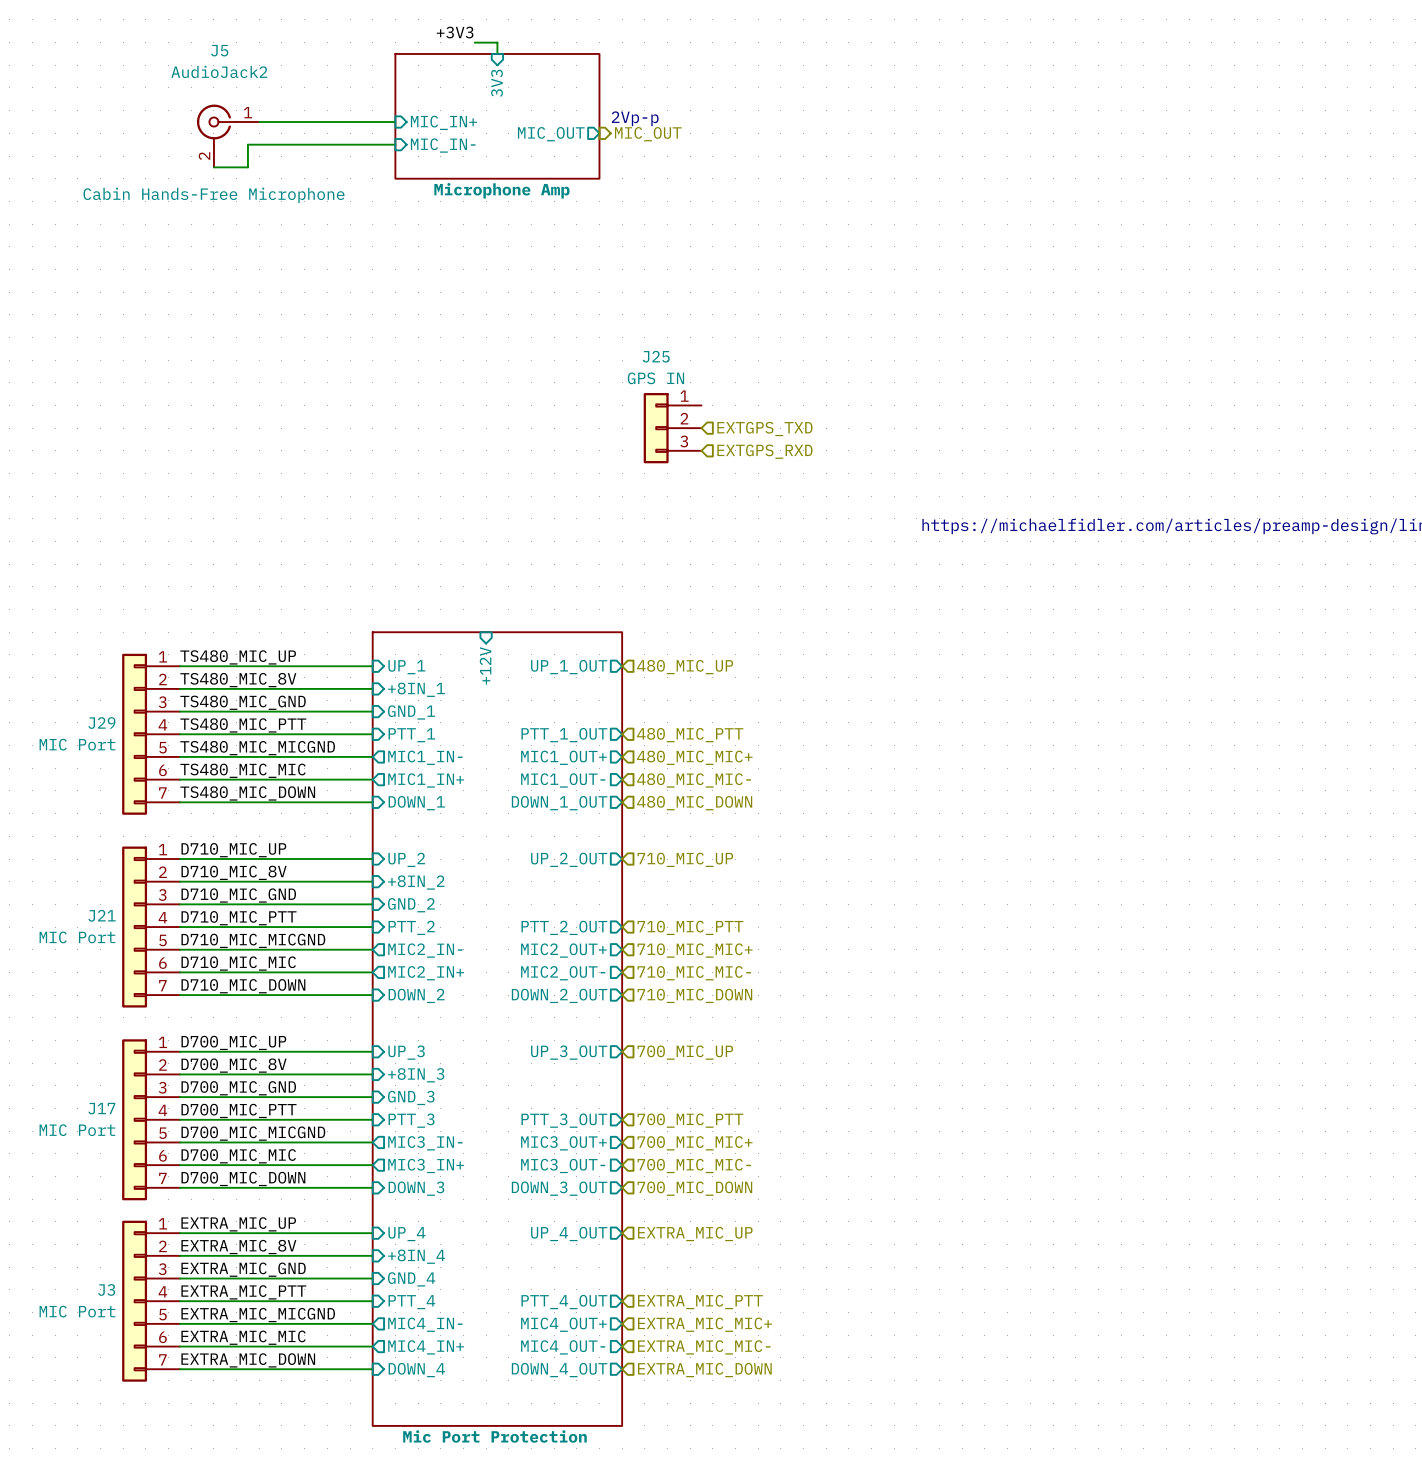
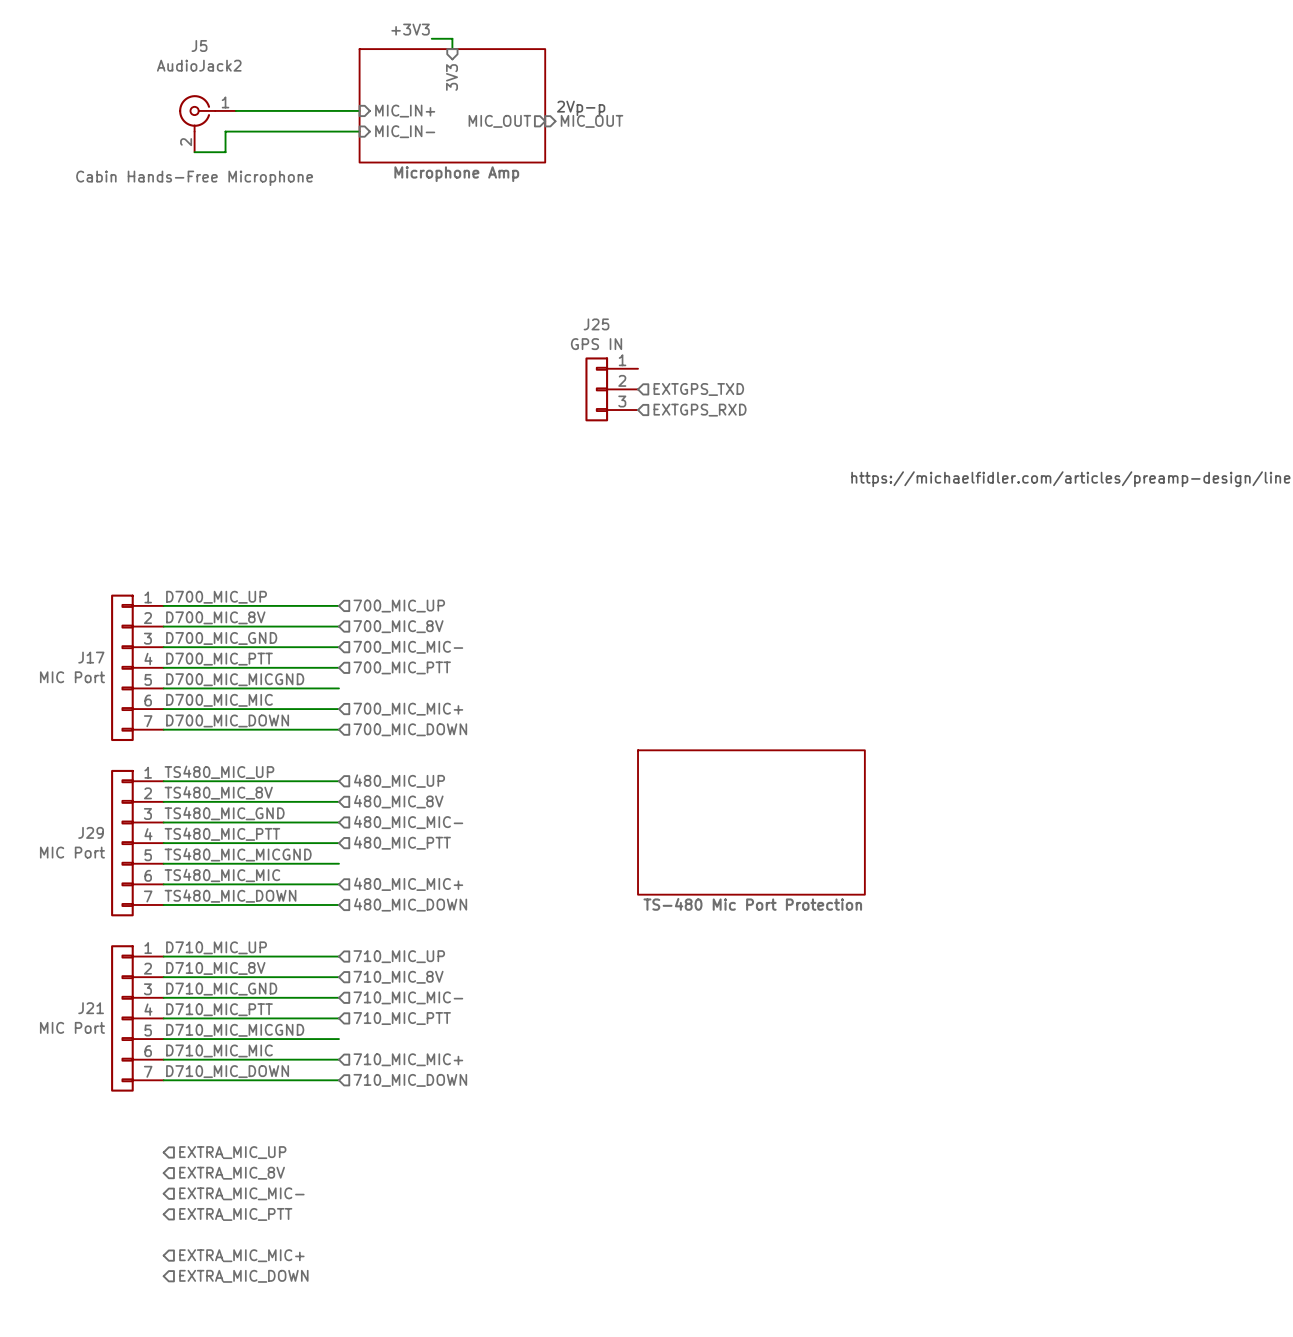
label: TS480_MIC_UP (238, 657) -> D700_MIC_UP (216, 597)
sheet pin: +12V (485, 665) -> none
sheet pin: UP_1 (406, 667) -> none
hierarchical label: none -> 700_MIC_UP (399, 606)
sheet pin: UP_1_OUT (569, 667) -> none
hierarchical label: 480_MIC_UP (685, 667) -> none
label: TS480_MIC_8V (238, 680) -> D700_MIC_8V (215, 617)
sheet pin: +8IN_1 (416, 689) -> none
hierarchical label: none -> 700_MIC_8V (398, 626)
label: TS480_MIC_GND (243, 702) -> D700_MIC_GND (221, 638)
sheet pin: GND_1 (411, 712) -> none
hierarchical label: none -> 700_MIC_MIC- (408, 647)
J29 name: J29 (101, 723) -> J17 (91, 657)
label: TS480_MIC_PTT (243, 725) -> D700_MIC_PTT (219, 659)
sheet pin: PTT_1 (411, 735) -> none
hierarchical label: none -> 700_MIC_PTT (402, 667)
sheet pin: PTT_1_OUT (564, 735) -> none
hierarchical label: 480_MIC_PTT (690, 735) -> none
label: TS480_MIC_MICGND (257, 748) -> D700_MIC_MICGND (235, 679)
sheet pin: MIC1_IN- (425, 757) -> none
sheet pin: MIC1_OUT+ (563, 757) -> none
hierarchical label: 480_MIC_MIC+ (694, 757) -> none
label: TS480_MIC_MIC (243, 770) -> D700_MIC_MIC (219, 700)
sheet pin: MIC1_IN+ (426, 780) -> none
hierarchical label: none -> 700_MIC_MIC+ (408, 709)
sheet pin: MIC1_OUT- (563, 780) -> none
hierarchical label: 480_MIC_MIC- (694, 780) -> none
label: TS480_MIC_DOWN (247, 793) -> D700_MIC_DOWN (227, 720)
sheet pin: DOWN_1 (416, 803) -> none
hierarchical label: none -> 700_MIC_DOWN (410, 729)
sheet pin: DOWN_1_OUT (559, 803) -> none
hierarchical label: 480_MIC_DOWN (694, 803) -> none
label: D710_MIC_UP (233, 850) -> TS480_MIC_UP (219, 772)
sheet pin: UP_2 (406, 859) -> none
hierarchical label: none -> 480_MIC_UP (399, 781)
sheet pin: UP_2_OUT (569, 859) -> none
hierarchical label: 710_MIC_UP (685, 859) -> none
label: D710_MIC_8V (234, 872) -> TS480_MIC_8V (218, 792)
sheet pin: +8IN_2 (416, 882) -> none
hierarchical label: none -> 480_MIC_8V (398, 801)
label: D710_MIC_GND (238, 895) -> TS480_MIC_GND (224, 813)
sheet TS-480 Mic Port Protection: none -> (751, 822)
sheet pin: GND_2 (411, 905) -> none
hierarchical label: none -> 480_MIC_MIC- (408, 822)
J21 name: J21 (102, 915) -> J29 (91, 832)
label: D710_MIC_PTT (239, 918) -> TS480_MIC_PTT (222, 834)
sheet pin: PTT_2 (411, 927) -> none
hierarchical label: none -> 480_MIC_PTT (402, 842)
sheet pin: PTT_2_OUT (564, 927) -> none
hierarchical label: 710_MIC_PTT (690, 927) -> none
label: D710_MIC_MICGND (253, 940) -> TS480_MIC_MICGND (238, 854)
sheet pin: MIC2_IN- (425, 950) -> none
sheet pin: MIC2_OUT+ (563, 950) -> none
hierarchical label: 710_MIC_MIC+ (695, 950) -> none
label: D710_MIC_MIC (238, 963) -> TS480_MIC_MIC (222, 875)
sheet pin: MIC2_IN+ (426, 973) -> none
hierarchical label: none -> 480_MIC_MIC+ (408, 884)
sheet pin: MIC2_OUT- (563, 973) -> none
hierarchical label: 710_MIC_MIC- (694, 973) -> none
label: D710_MIC_DOWN (243, 986) -> TS480_MIC_DOWN (230, 896)
sheet pin: DOWN_2 (416, 995) -> none
hierarchical label: none -> 480_MIC_DOWN (410, 904)
sheet pin: DOWN_2_OUT (559, 995) -> none
hierarchical label: 710_MIC_DOWN (694, 995) -> none
sheet Mic Port Protection: (497, 1029) -> none
label: D700_MIC_UP (233, 1042) -> D710_MIC_UP (216, 947)
sheet pin: UP_3 (406, 1052) -> none
hierarchical label: none -> 710_MIC_UP (399, 956)
sheet pin: UP_3_OUT (569, 1052) -> none
hierarchical label: 700_MIC_UP (685, 1052) -> none
label: D700_MIC_8V (234, 1065) -> D710_MIC_8V (215, 968)
sheet pin: +8IN_3 (416, 1075) -> none
hierarchical label: none -> 710_MIC_8V (398, 977)
label: D700_MIC_GND (238, 1088) -> D710_MIC_GND (221, 989)
sheet pin: GND_3 (411, 1097) -> none
hierarchical label: none -> 710_MIC_MIC- (408, 997)
J17 name: J17 (101, 1108) -> J21 (91, 1008)
label: D700_MIC_PTT (239, 1110) -> D710_MIC_PTT (219, 1009)
sheet pin: PTT_3 (411, 1120) -> none
hierarchical label: none -> 710_MIC_PTT (402, 1018)
sheet pin: PTT_3_OUT (564, 1120) -> none
hierarchical label: 700_MIC_PTT (690, 1120) -> none
label: D700_MIC_MICGND (253, 1133) -> D710_MIC_MICGND (235, 1030)
sheet pin: MIC3_IN- (425, 1143) -> none
sheet pin: MIC3_OUT+ (563, 1143) -> none
hierarchical label: 700_MIC_MIC+ (695, 1143) -> none
label: D700_MIC_MIC (238, 1156) -> D710_MIC_MIC (219, 1050)
sheet pin: MIC3_IN+ (426, 1165) -> none
hierarchical label: none -> 710_MIC_MIC+ (408, 1059)
sheet pin: MIC3_OUT- (563, 1165) -> none
hierarchical label: 700_MIC_MIC- (694, 1165) -> none
label: D700_MIC_DOWN (243, 1178) -> D710_MIC_DOWN (227, 1071)
sheet pin: DOWN_3 (416, 1188) -> none
hierarchical label: none -> 710_MIC_DOWN (410, 1080)
sheet pin: DOWN_3_OUT (559, 1188) -> none
hierarchical label: 700_MIC_DOWN (694, 1188) -> none
label: EXTRA_MIC_UP (238, 1224) -> none
wire: (179, 1233) (372, 1233) -> none
sheet pin: UP_4 (406, 1234) -> none
sheet pin: UP_4_OUT (569, 1234) -> none
hierarchical label: EXTRA_MIC_UP (695, 1234) -> none
label: EXTRA_MIC_8V (238, 1247) -> none
wire: (179, 1255) (372, 1255) -> none
sheet pin: +8IN_4 (416, 1256) -> none
hierarchical label: none -> EXTRA_MIC_UP (232, 1152)
label: EXTRA_MIC_GND (243, 1269) -> none
wire: (179, 1278) (372, 1278) -> none
sheet pin: GND_4 (411, 1279) -> none
hierarchical label: none -> EXTRA_MIC_8V (232, 1173)
label: EXTRA_MIC_PTT (243, 1292) -> none
J3: MIC Port (151, 1301) -> none
wire: (179, 1301) (372, 1301) -> none
sheet pin: PTT_4 (411, 1302) -> none
sheet pin: PTT_4_OUT (564, 1302) -> none
hierarchical label: EXTRA_MIC_PTT (700, 1302) -> none
hierarchical label: none -> EXTRA_MIC_MIC- (241, 1193)
label: EXTRA_MIC_MICGND (258, 1315) -> none
wire: (179, 1323) (372, 1323) -> none
sheet pin: MIC4_IN- (425, 1324) -> none
sheet pin: MIC4_OUT+ (563, 1324) -> none
hierarchical label: EXTRA_MIC_MIC+ (705, 1324) -> none
hierarchical label: none -> EXTRA_MIC_PTT (235, 1214)
label: EXTRA_MIC_MIC (243, 1337) -> none
wire: (179, 1346) (372, 1346) -> none
sheet pin: MIC4_IN+ (426, 1347) -> none
sheet pin: MIC4_OUT- (563, 1347) -> none
hierarchical label: EXTRA_MIC_MIC- (704, 1347) -> none
label: EXTRA_MIC_DOWN (248, 1360) -> none
wire: (179, 1369) (372, 1369) -> none
sheet pin: DOWN_4 (416, 1370) -> none
sheet pin: DOWN_4_OUT (559, 1370) -> none
hierarchical label: EXTRA_MIC_DOWN (704, 1370) -> none
hierarchical label: none -> EXTRA_MIC_MIC+ (241, 1255)
hierarchical label: none -> EXTRA_MIC_DOWN (243, 1276)

